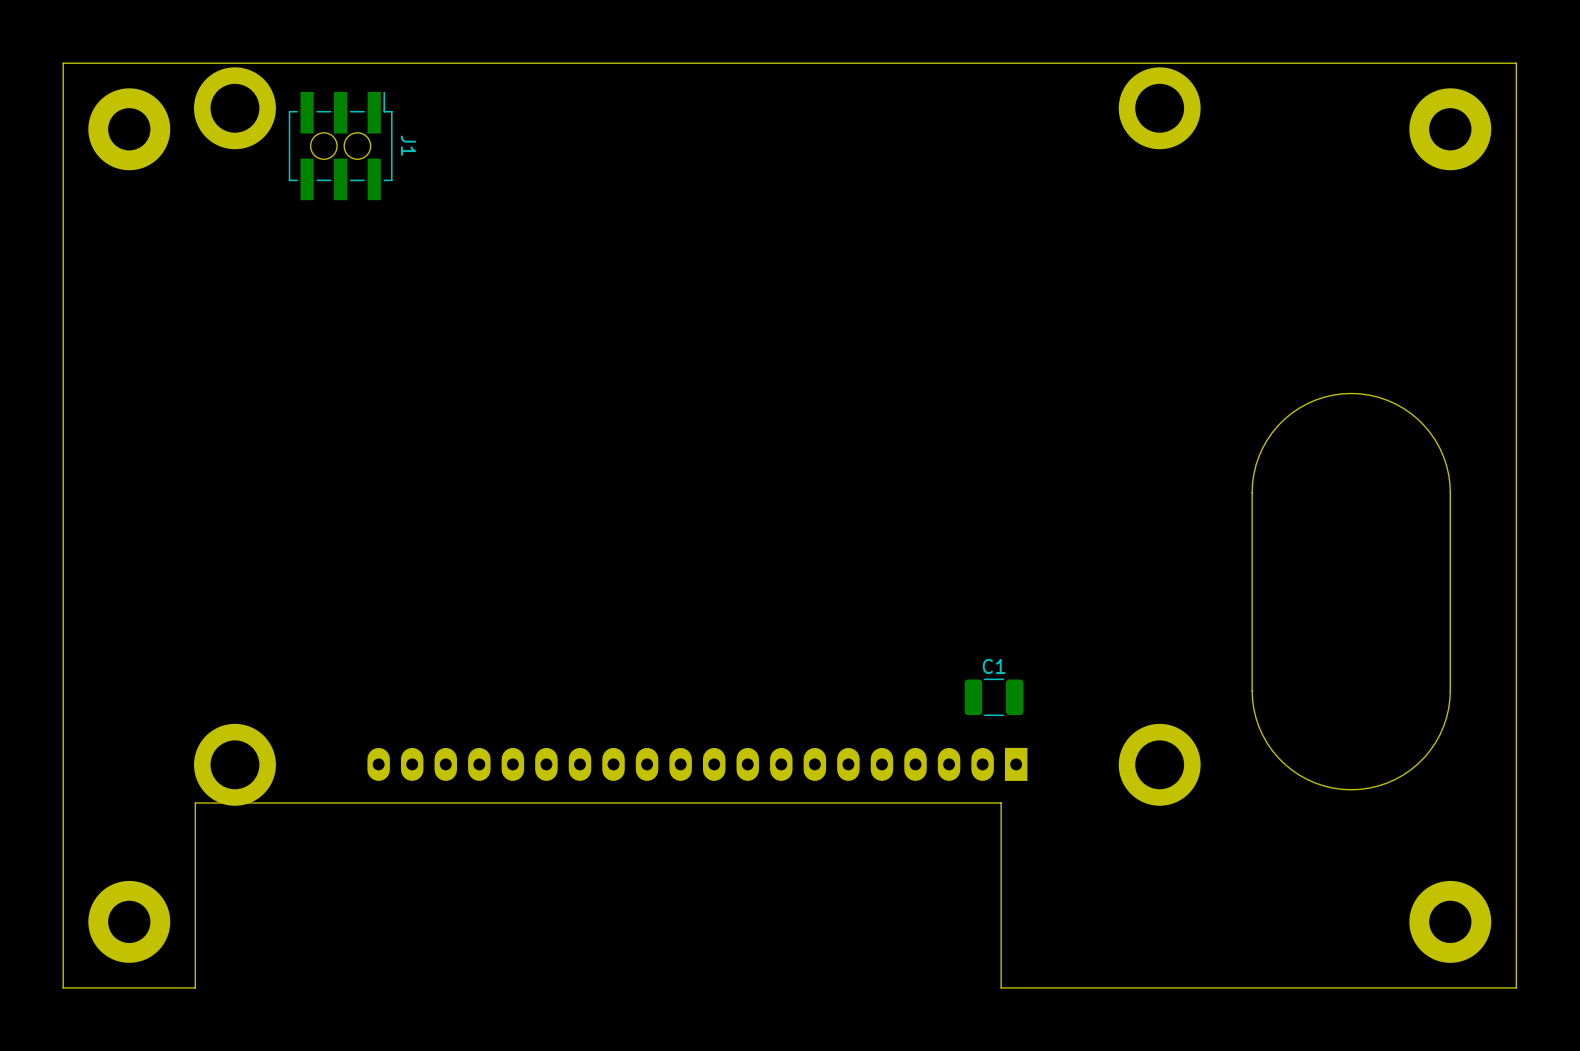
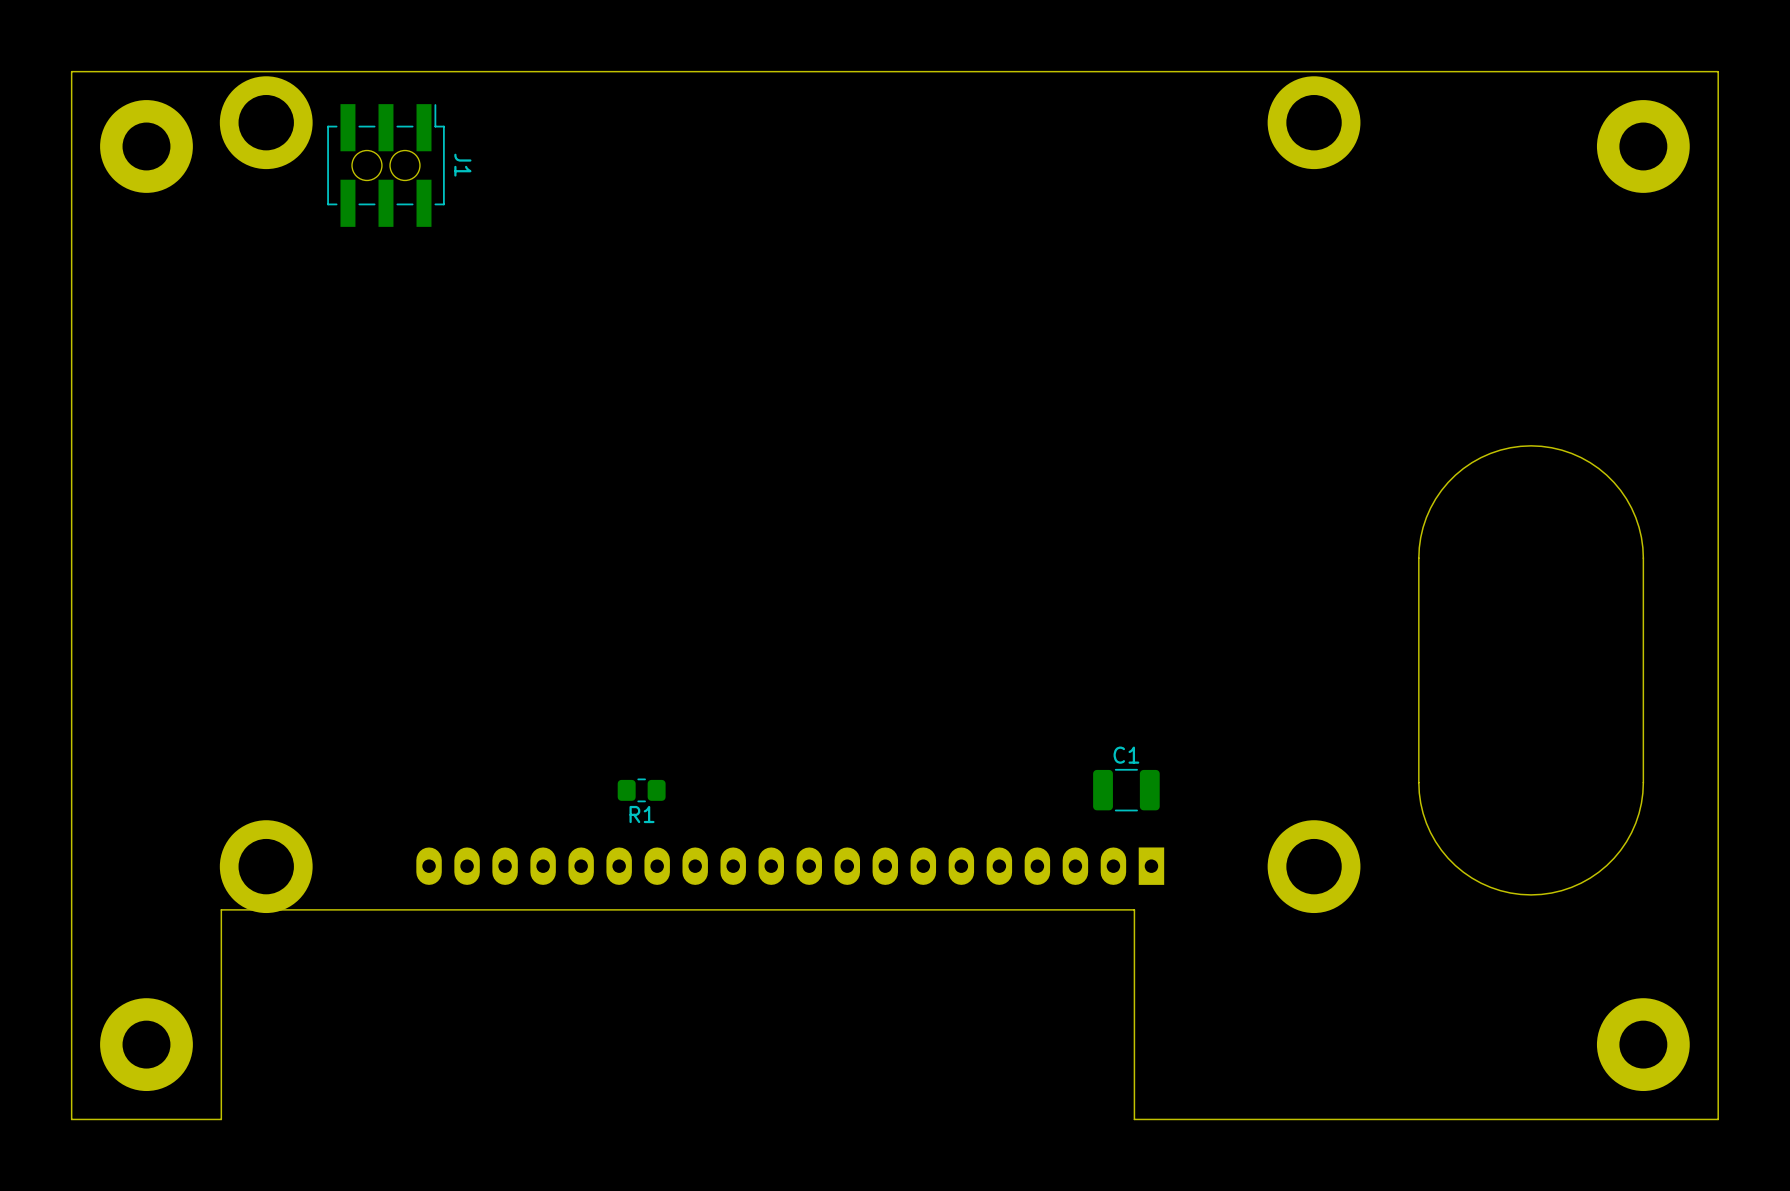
R1: none -> (641, 790)

